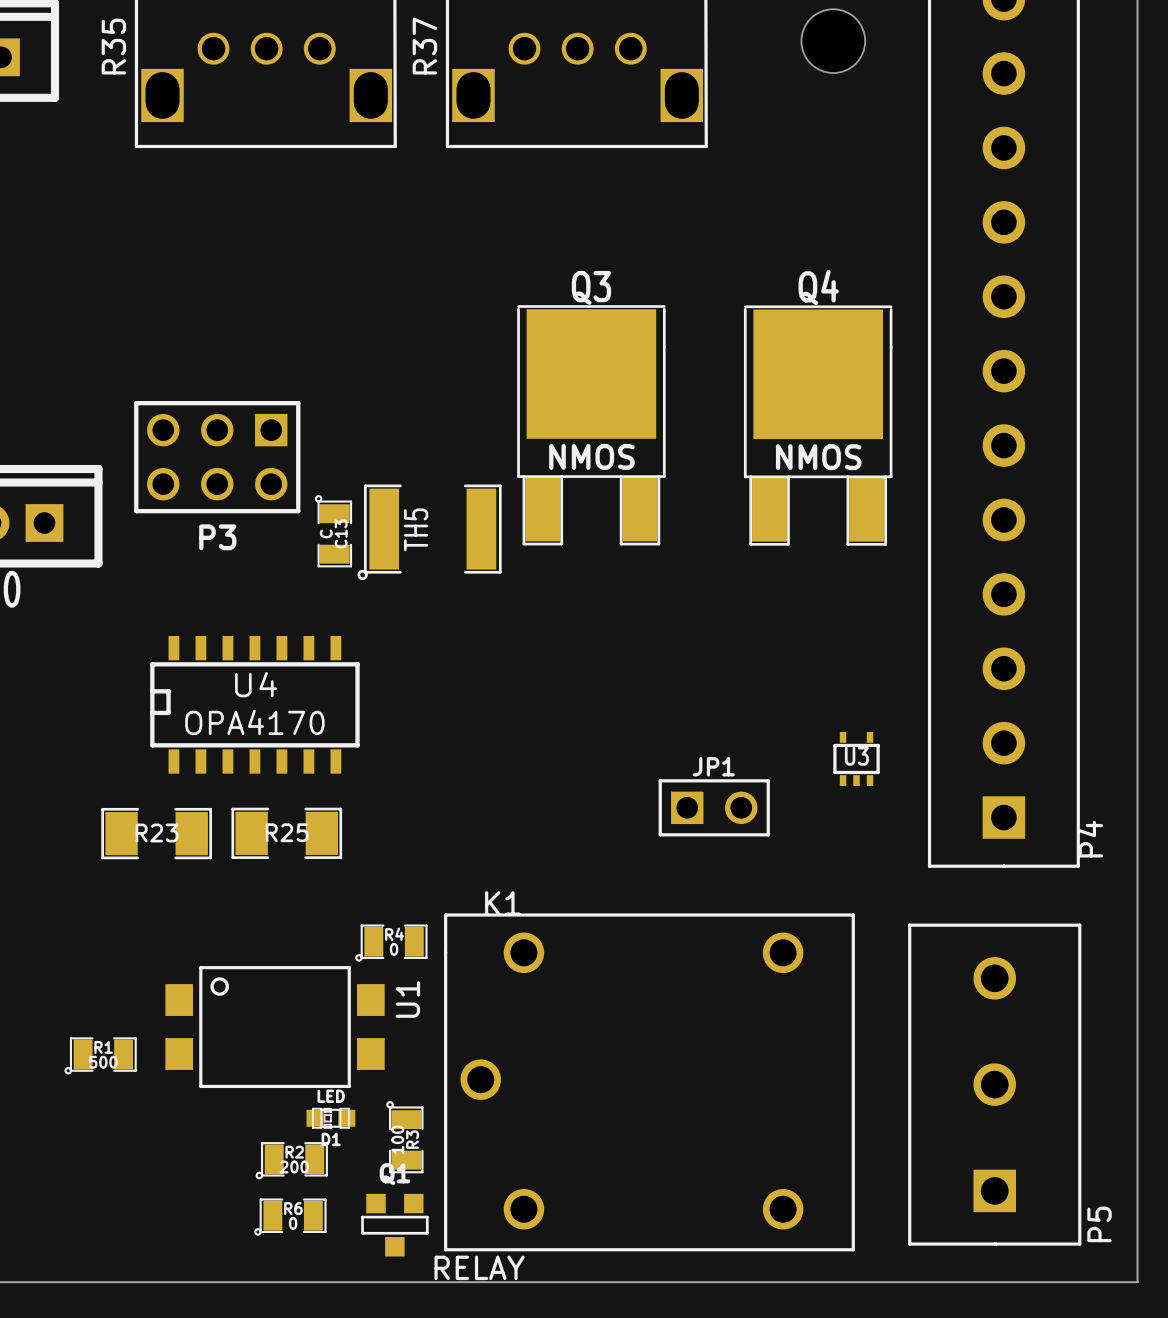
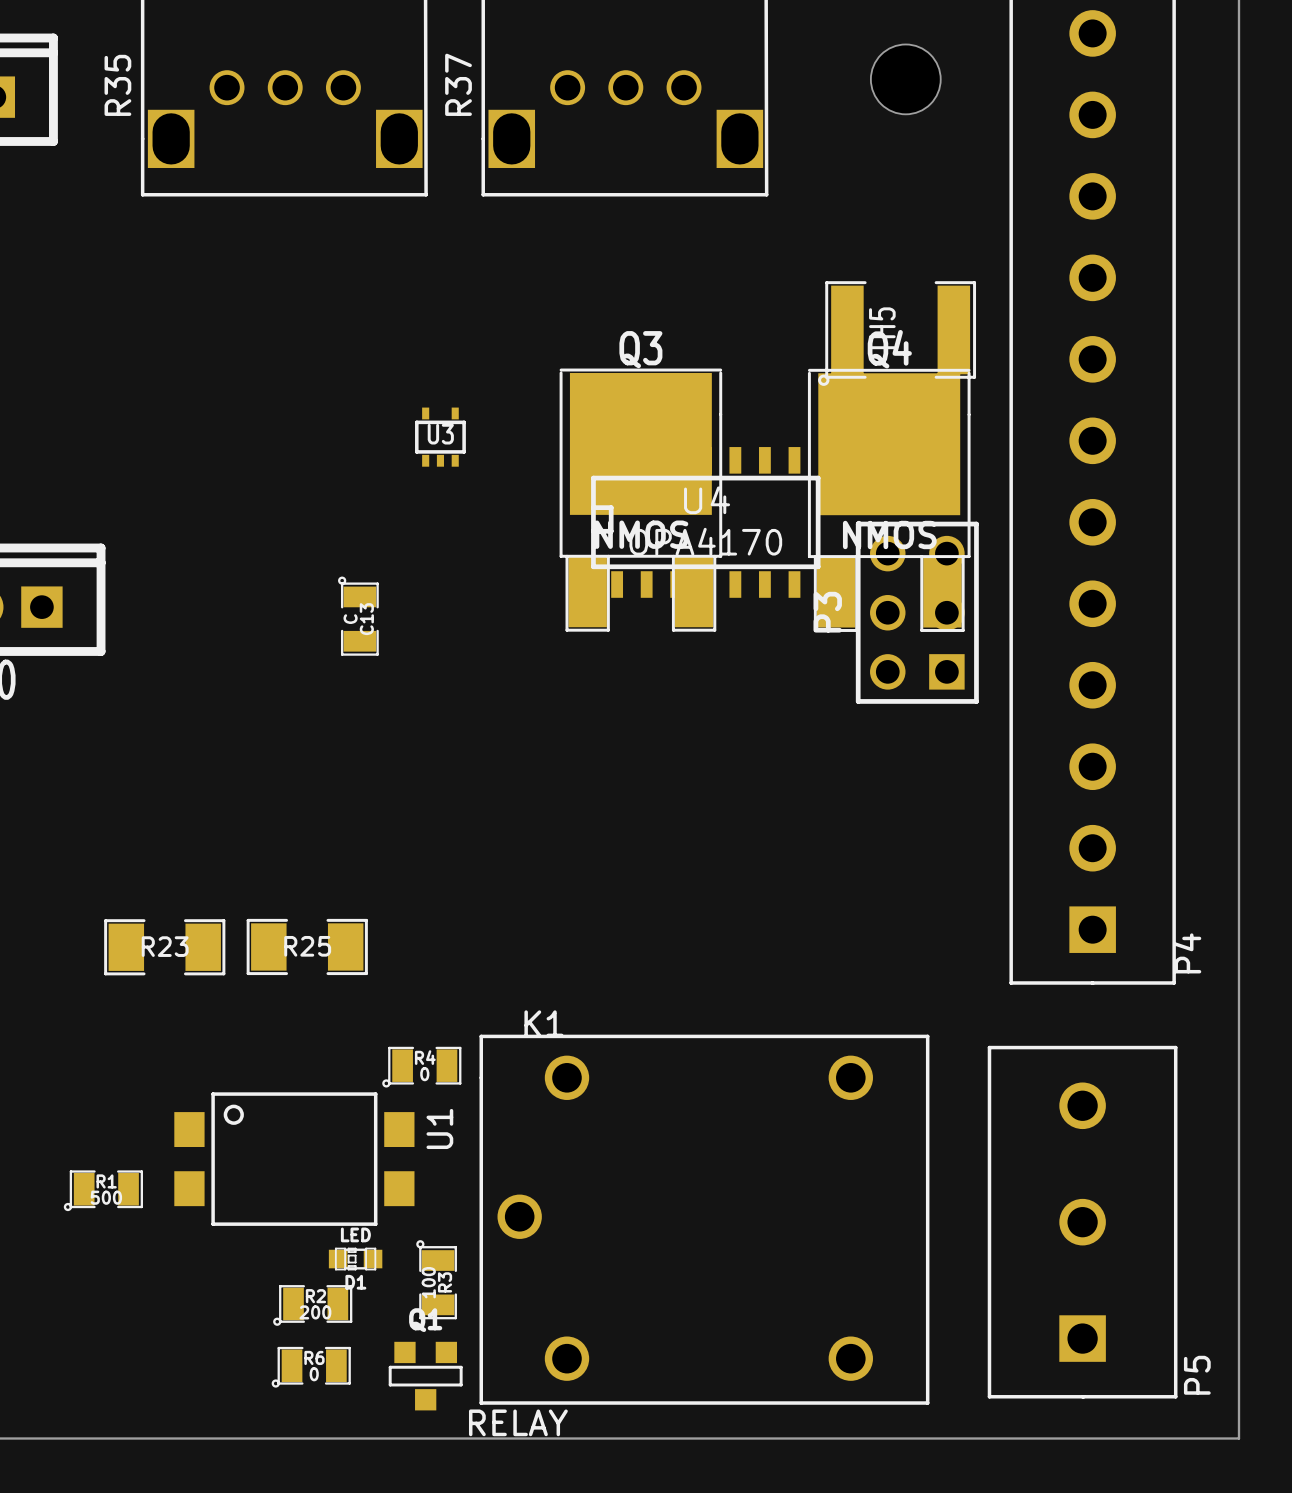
P3 rotation: 0° (217, 457) -> 90° clockwise (917, 612)
P3 position: (217, 457) -> (917, 612)
TH5 position: (429, 532) -> (897, 333)
U4 position: (254, 704) -> (705, 522)
U3 position: (856, 758) -> (440, 437)
JP1: (714, 807) -> none

